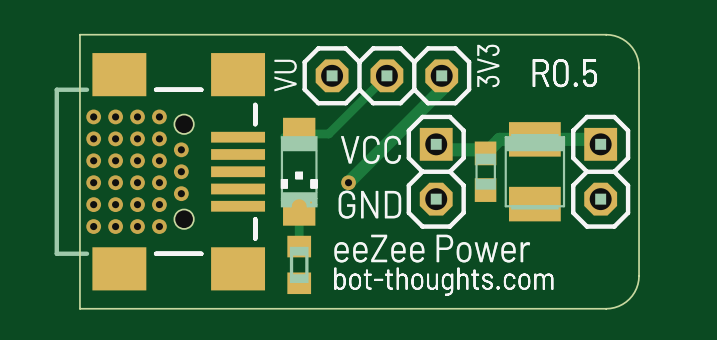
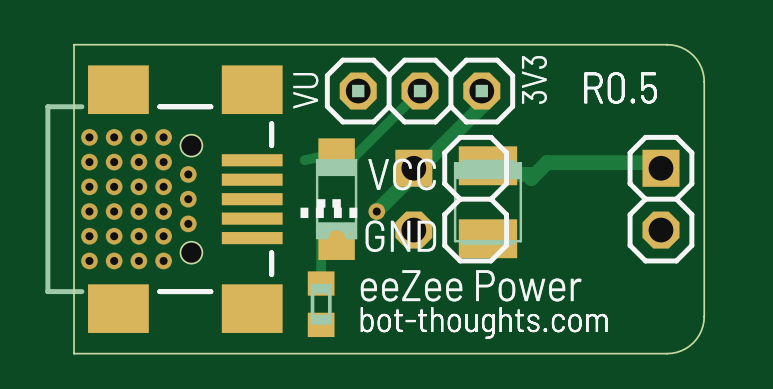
part footprint: [407, 115, 466, 229] -> [453, 146, 523, 259]
part position: (299, 171) -> (336, 199)
part: none -> (413, 199)
part: (485, 171) -> none
part: (534, 171) -> none
part side: top (600, 171) -> bottom (660, 199)

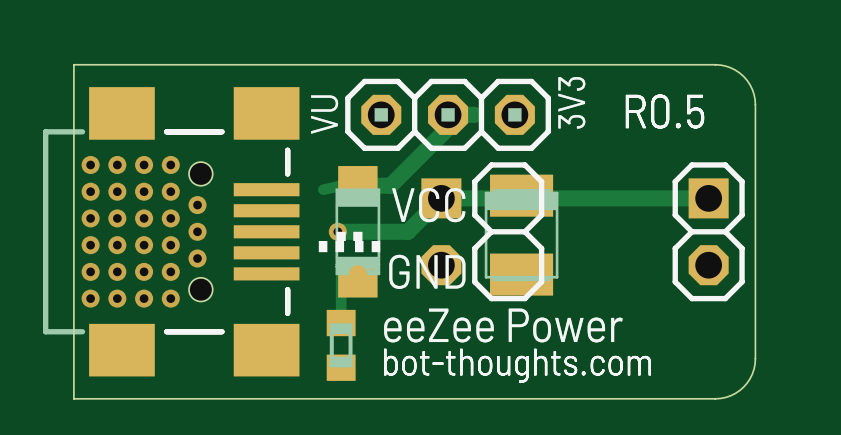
track: (420, 91) (354, 156) -> (474, 114) (461, 114) (390, 185) (377, 185)
track: (481, 91) (481, 106) (376, 211) -> none
track: (475, 168) (481, 174) (529, 174) (531, 178) (547, 162) (655, 162) (660, 168) -> (337, 231) (407, 231) (441, 198) (505, 198) (521, 192) (508, 195) (524, 195) (528, 198) (708, 198)
via position: (376, 211) -> (337, 231)

